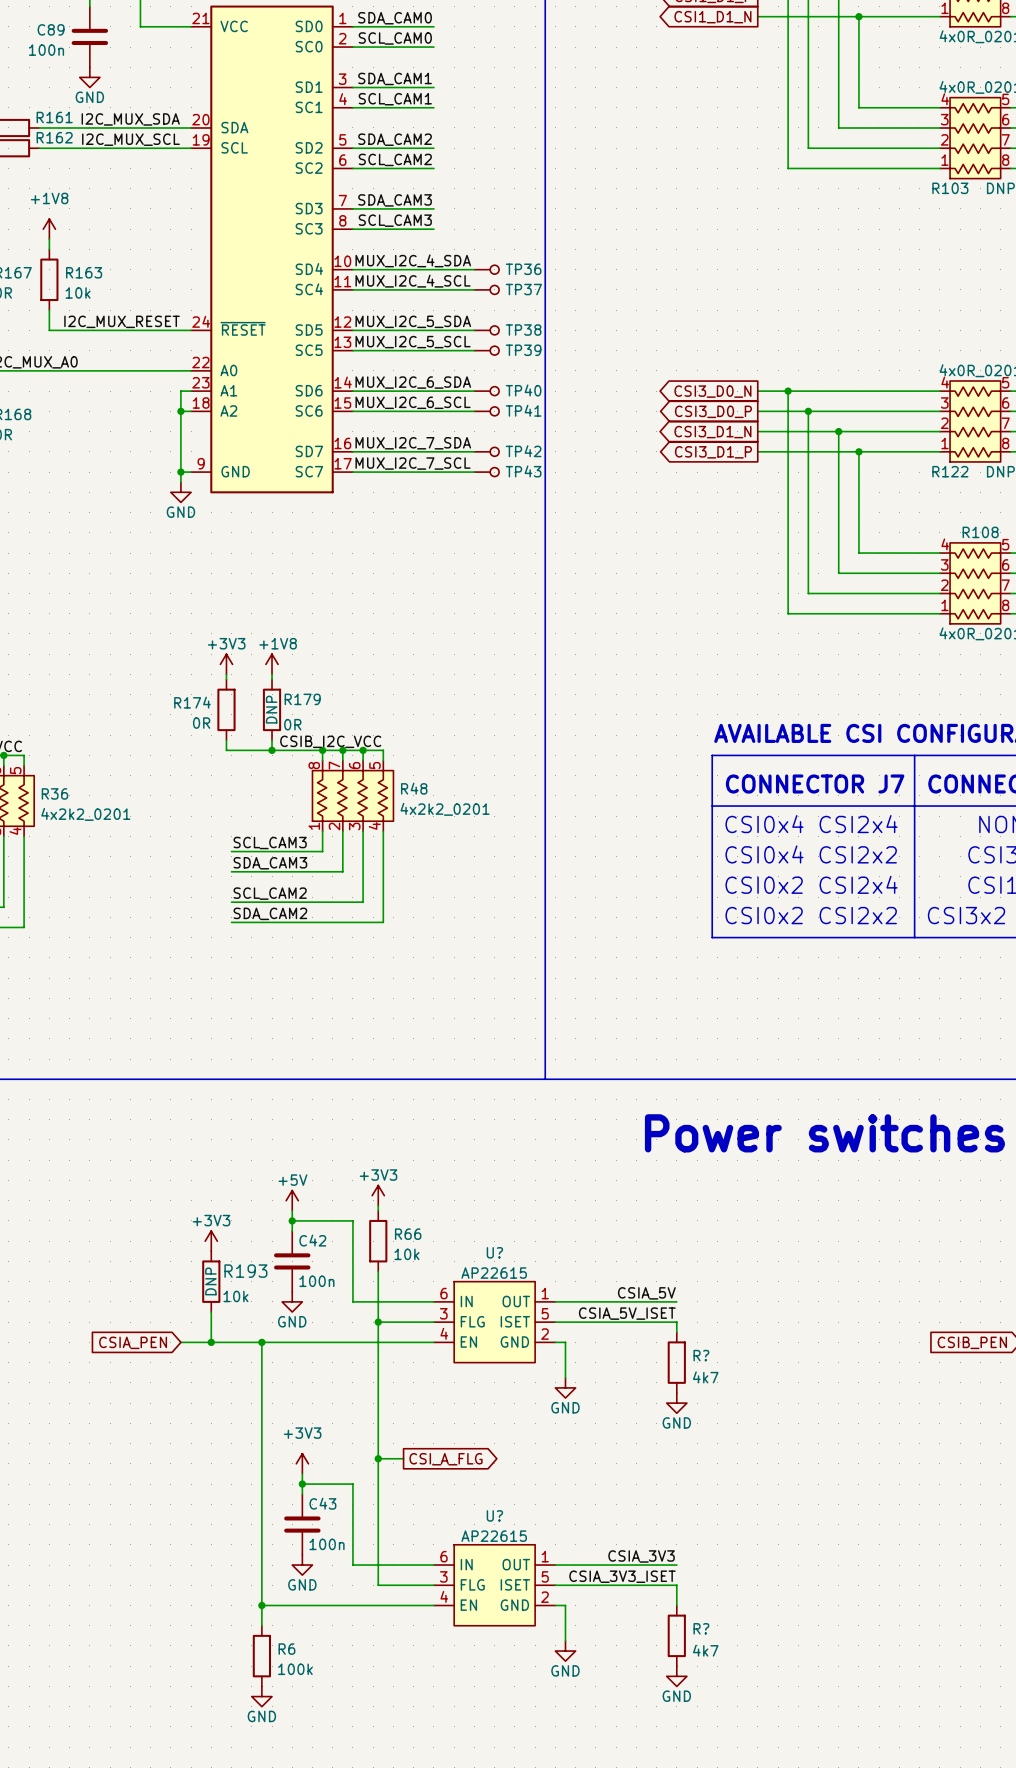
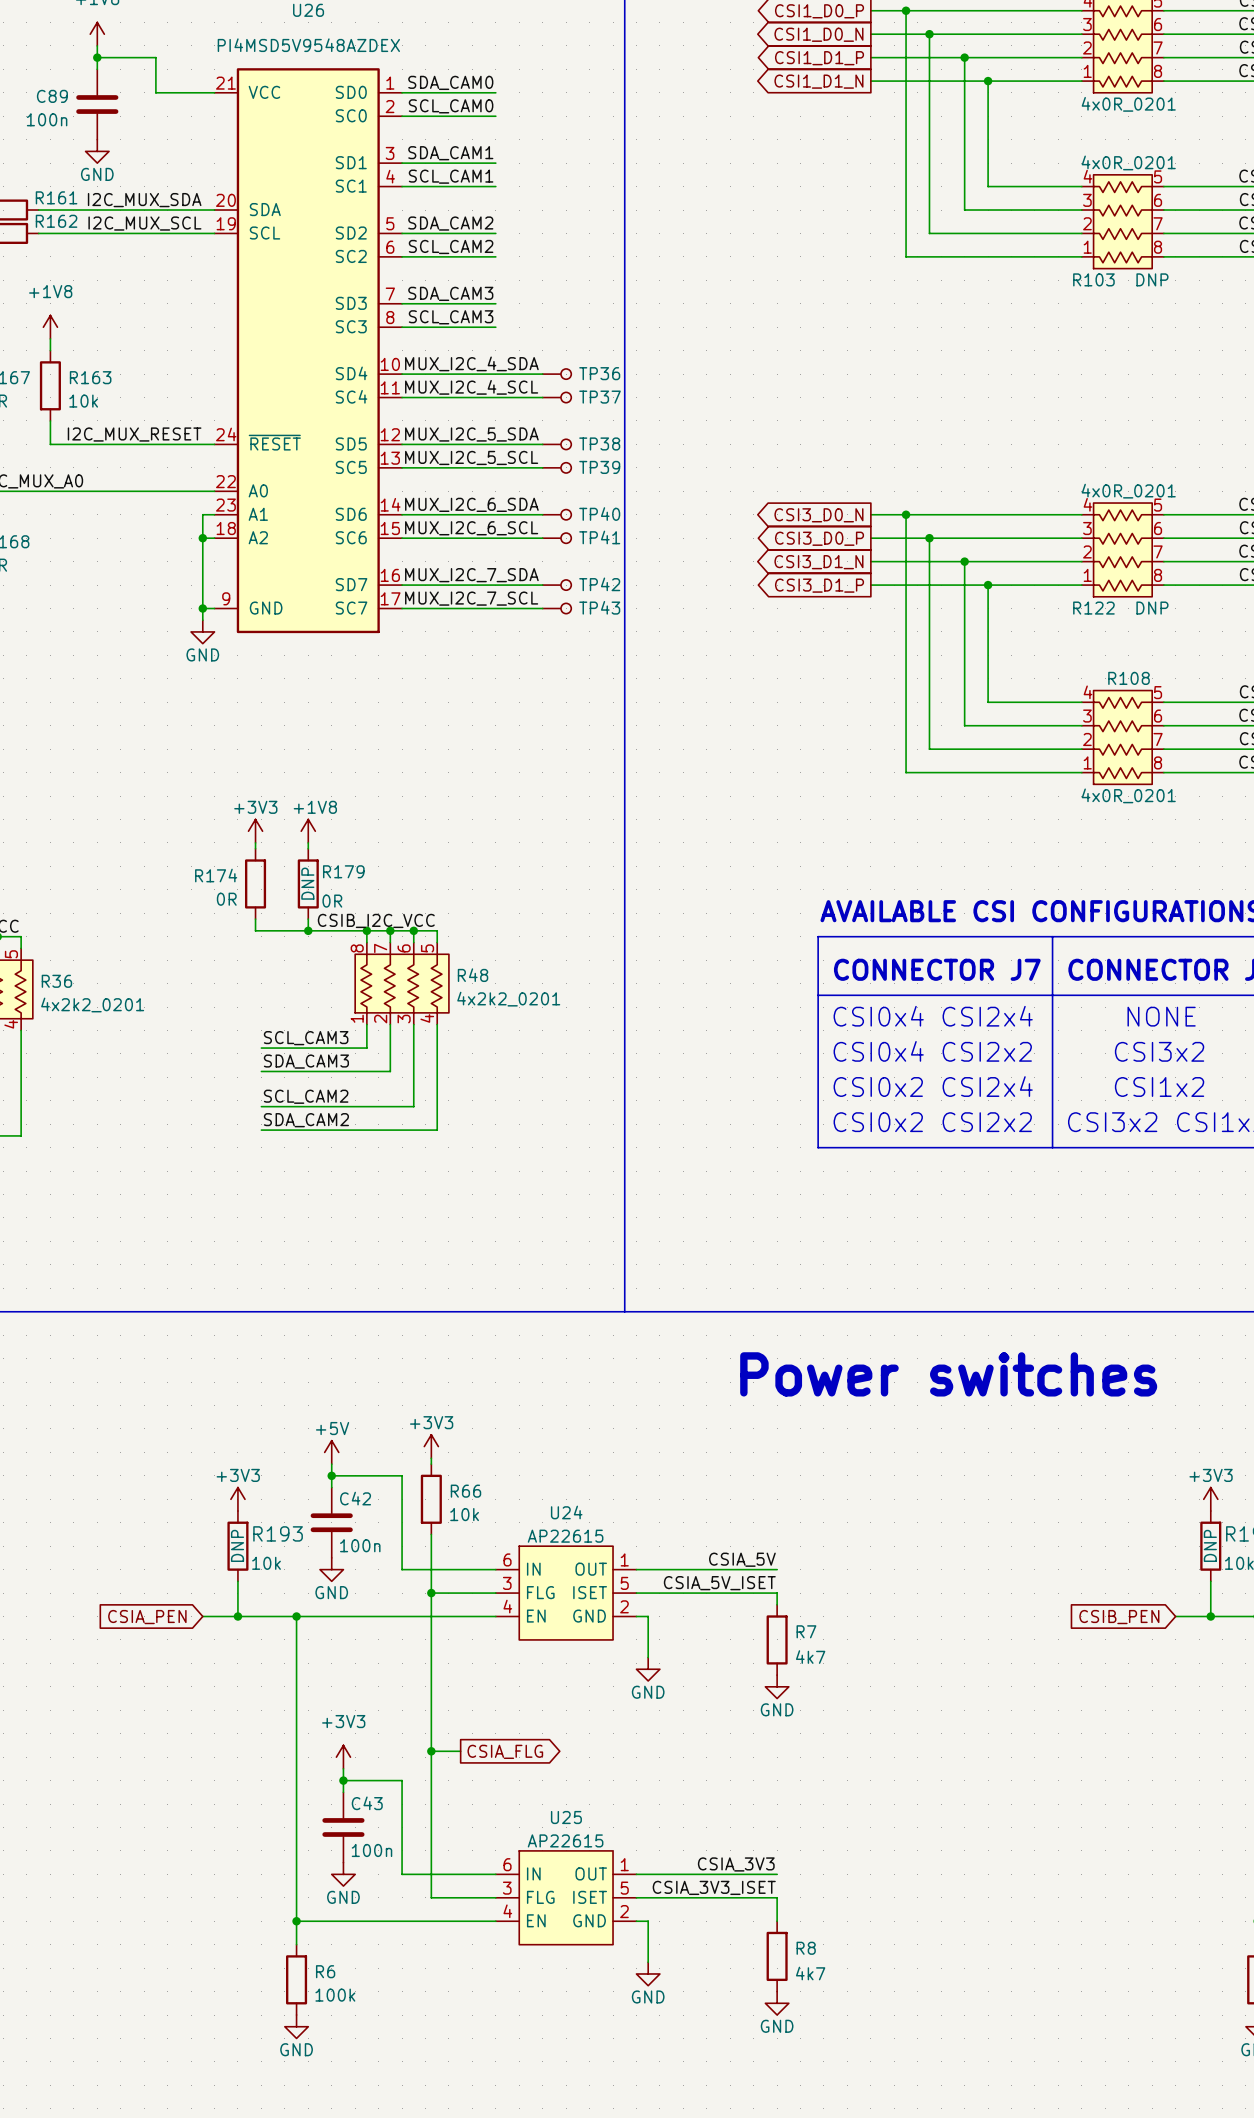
U? name: U? (494, 1252) -> U24 (566, 1512)
R? name: R? (701, 1355) -> R7 (806, 1631)
global label: CSI_A_FLG (445, 1459) -> CSIA_FLG (505, 1751)
U? name: U? (494, 1515) -> U25 (566, 1817)
R? name: R? (701, 1628) -> R8 (806, 1948)

